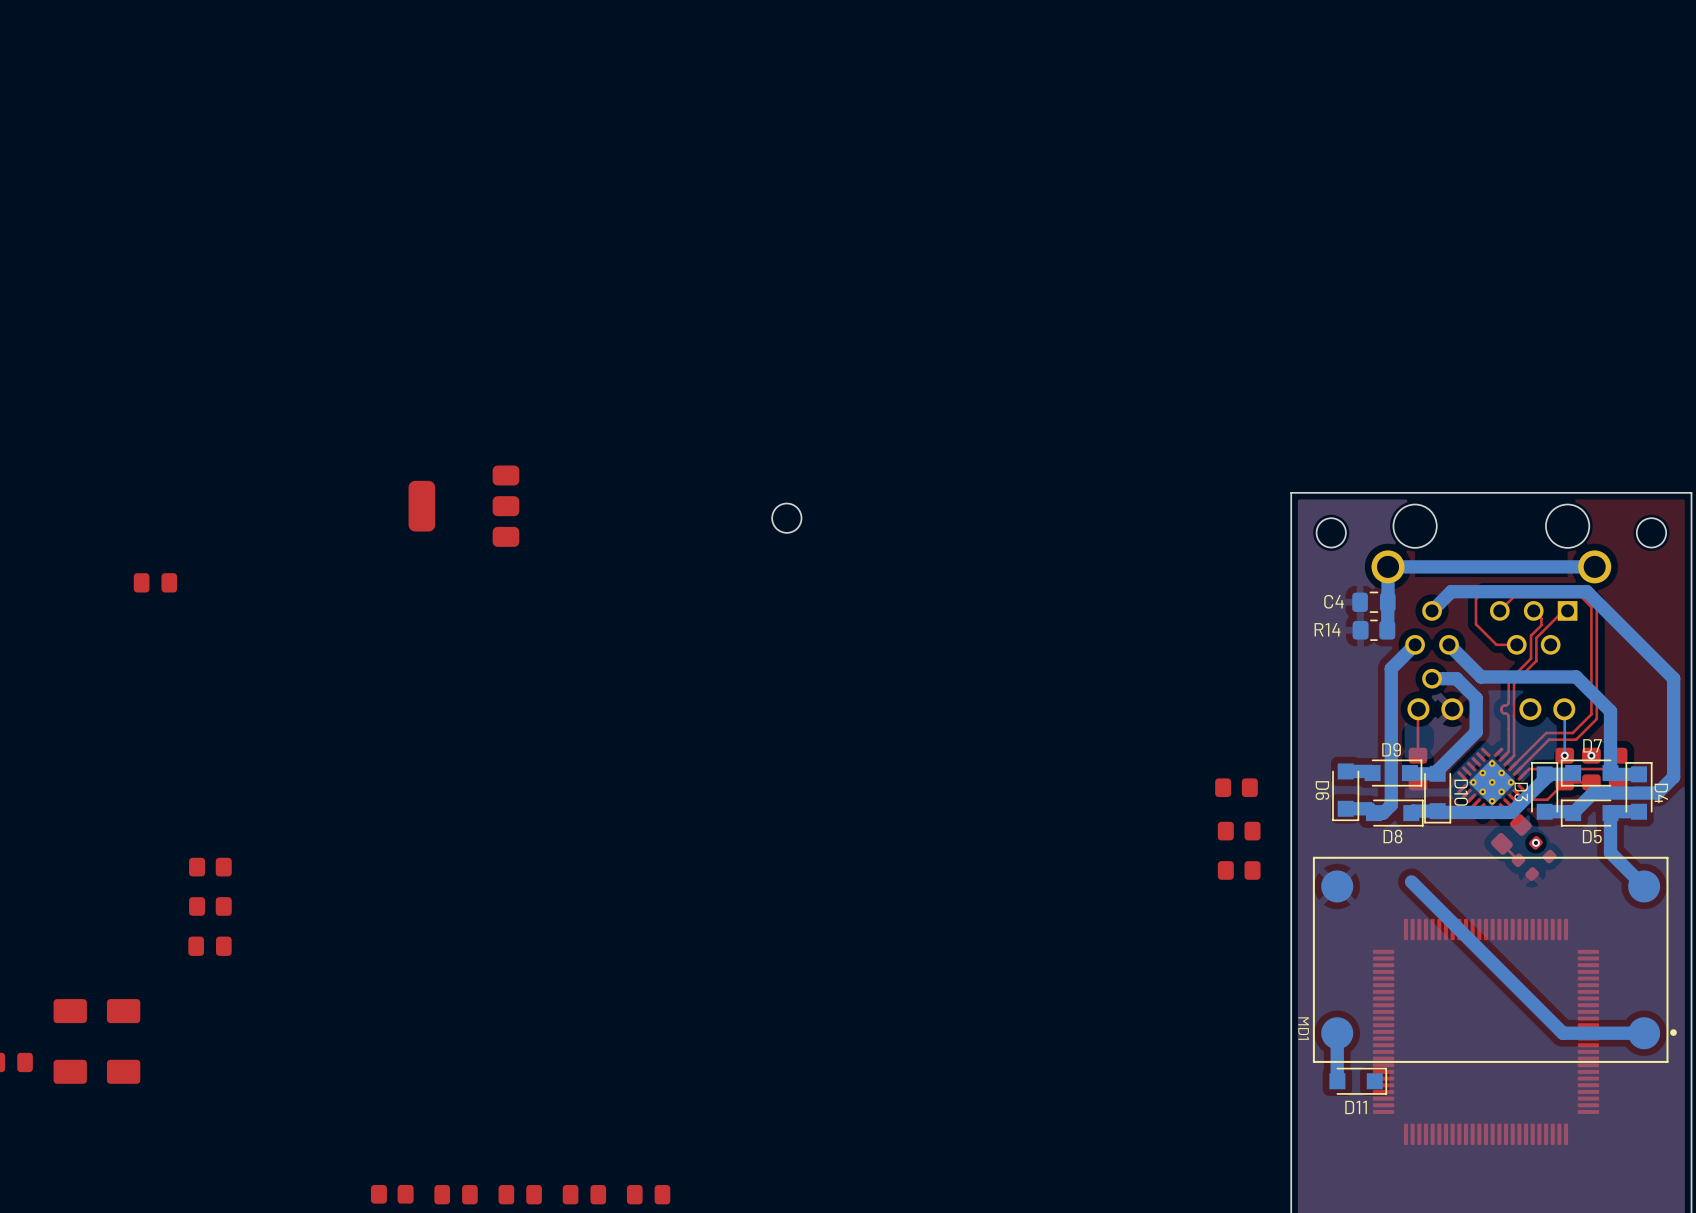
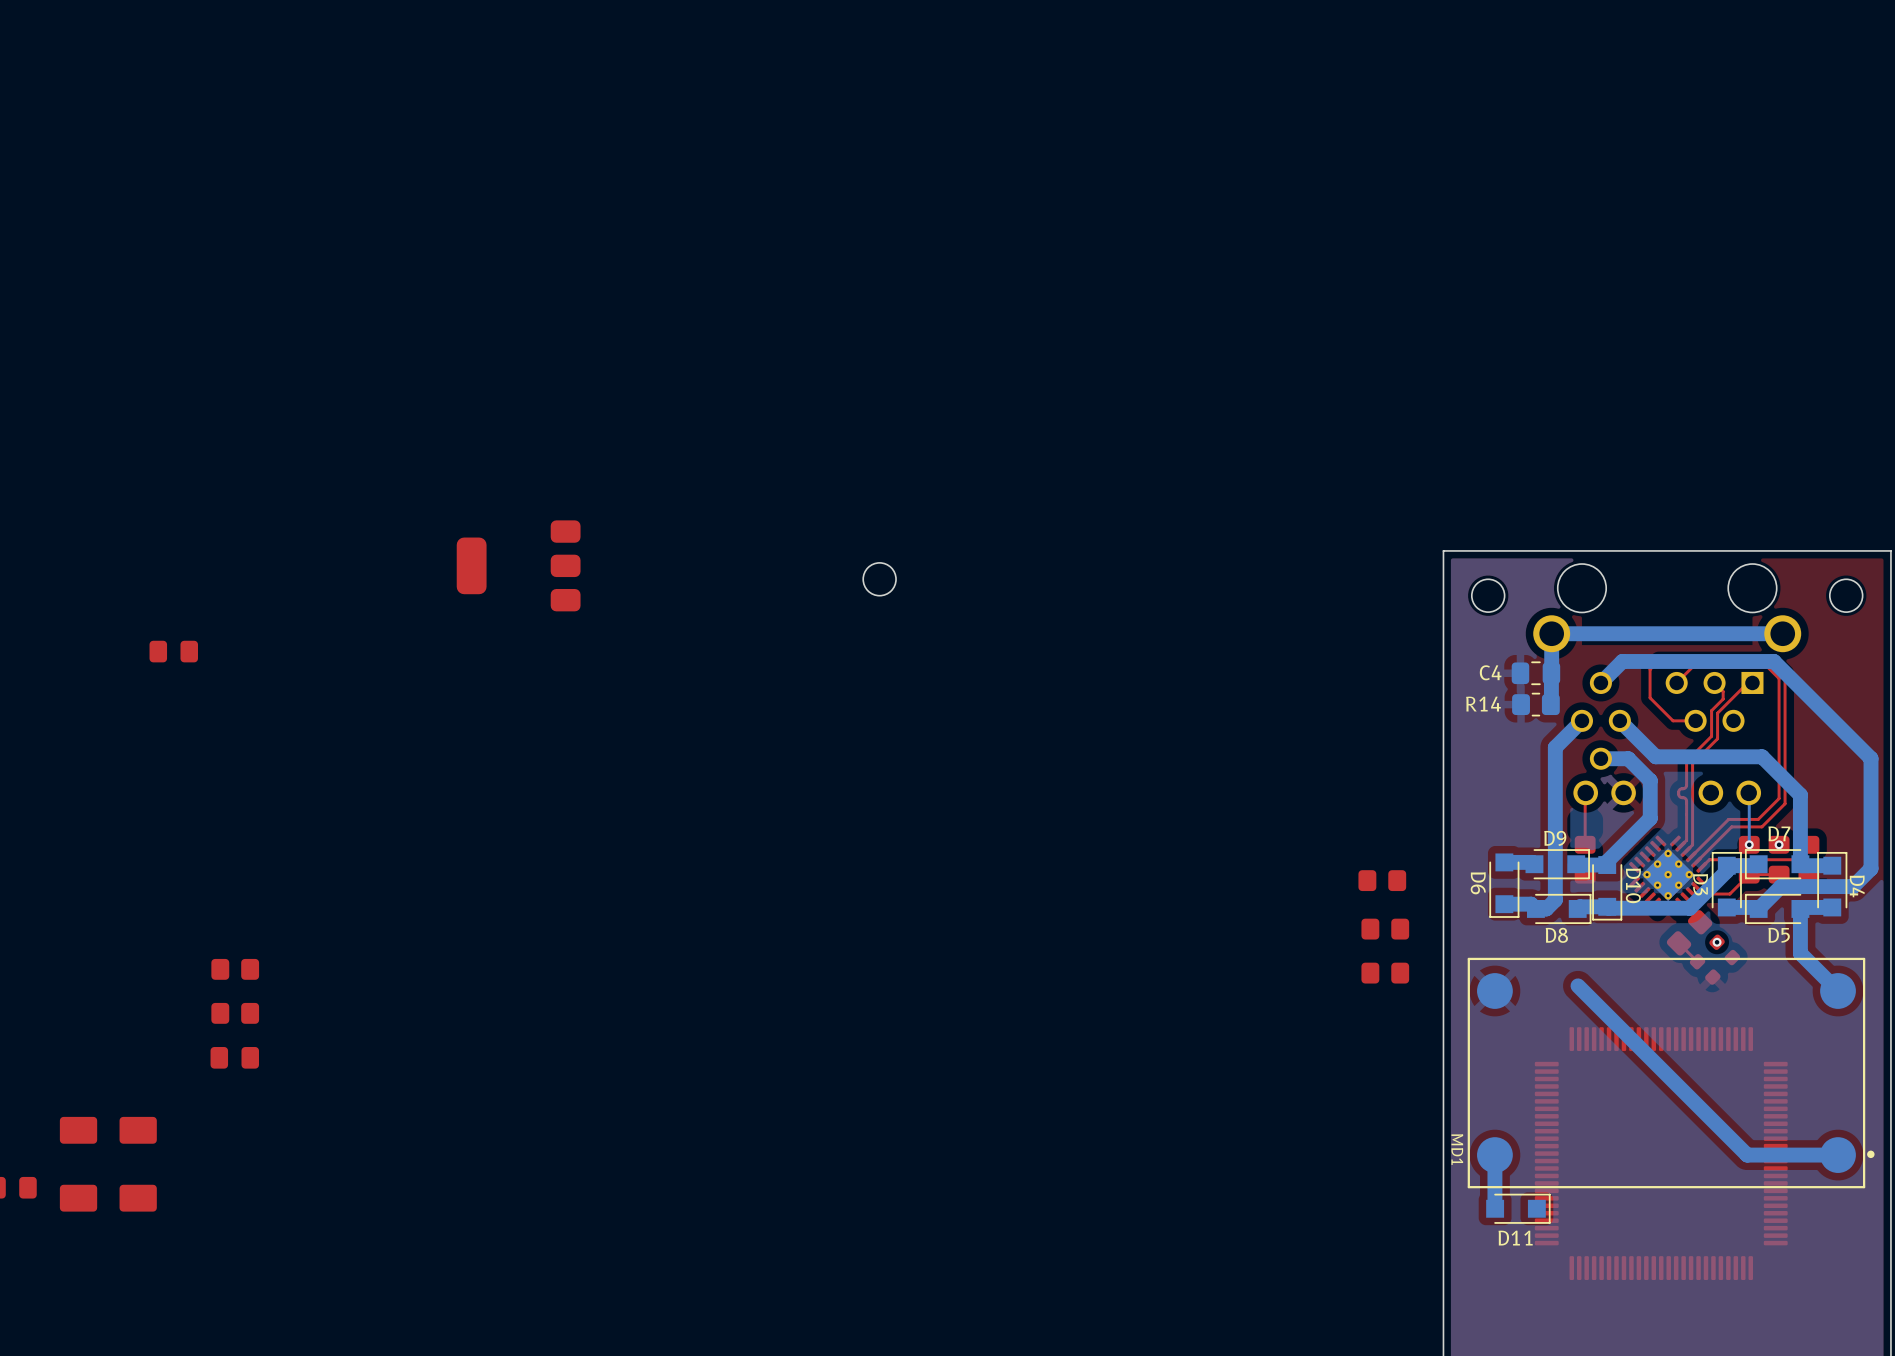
part: (392, 1194) -> none
part: (456, 1194) -> none
part: (520, 1194) -> none
part: (584, 1194) -> none
part: (648, 1194) -> none

